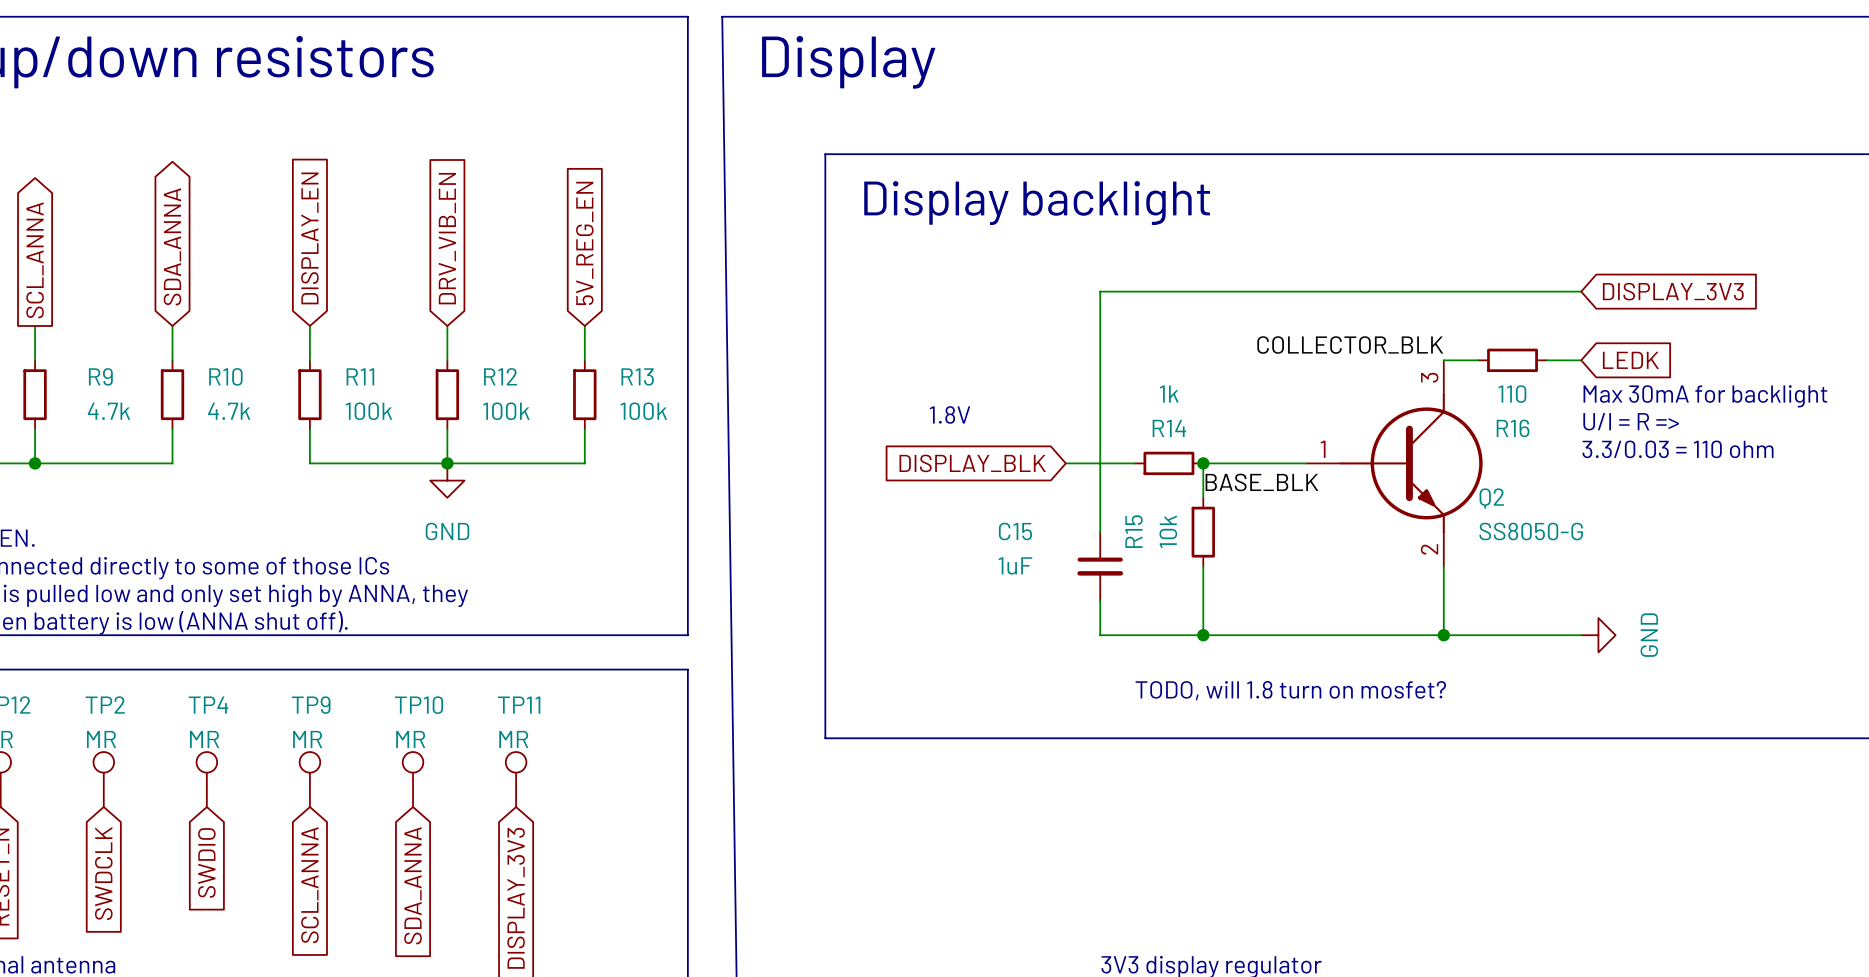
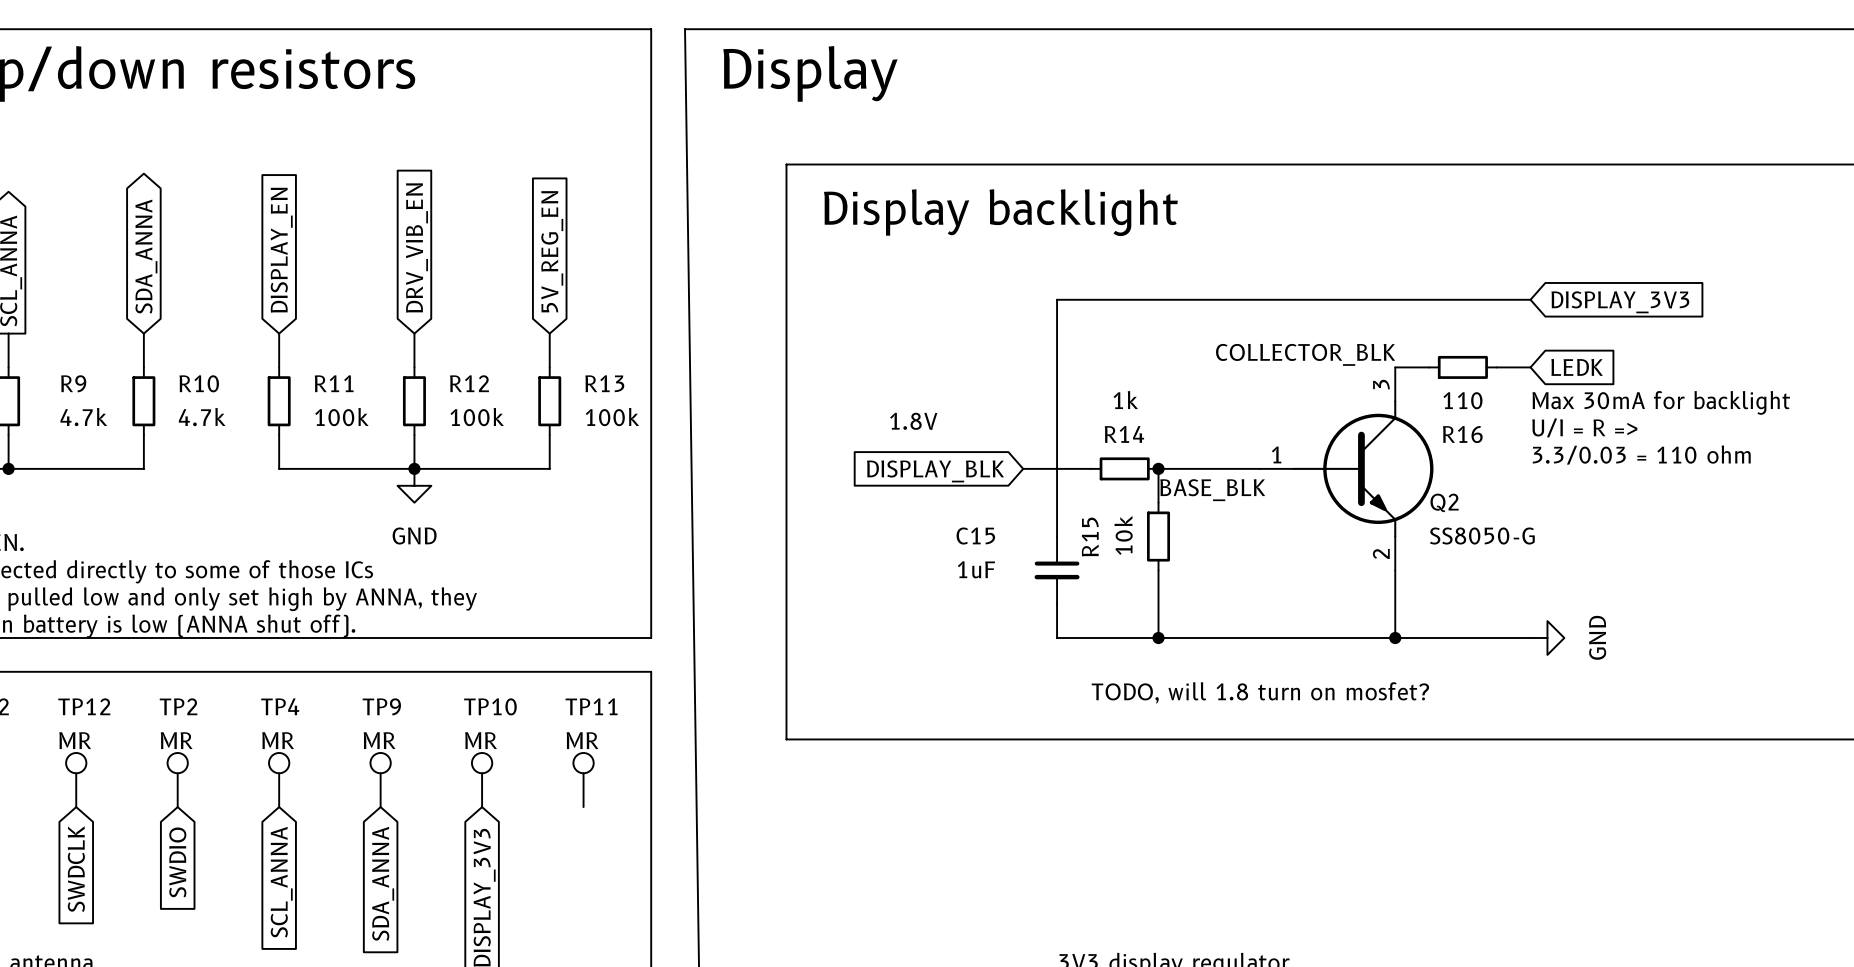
TP2 name: TP2 (105, 705) -> TP12 (84, 706)
TP4 name: TP4 (208, 705) -> TP2 (178, 706)
TP9 name: TP9 (311, 705) -> TP4 (280, 706)
TP10 name: TP10 (419, 705) -> TP9 (381, 706)
TP11 name: TP11 (519, 705) -> TP10 (490, 706)
TP11: none -> MR (583, 780)

